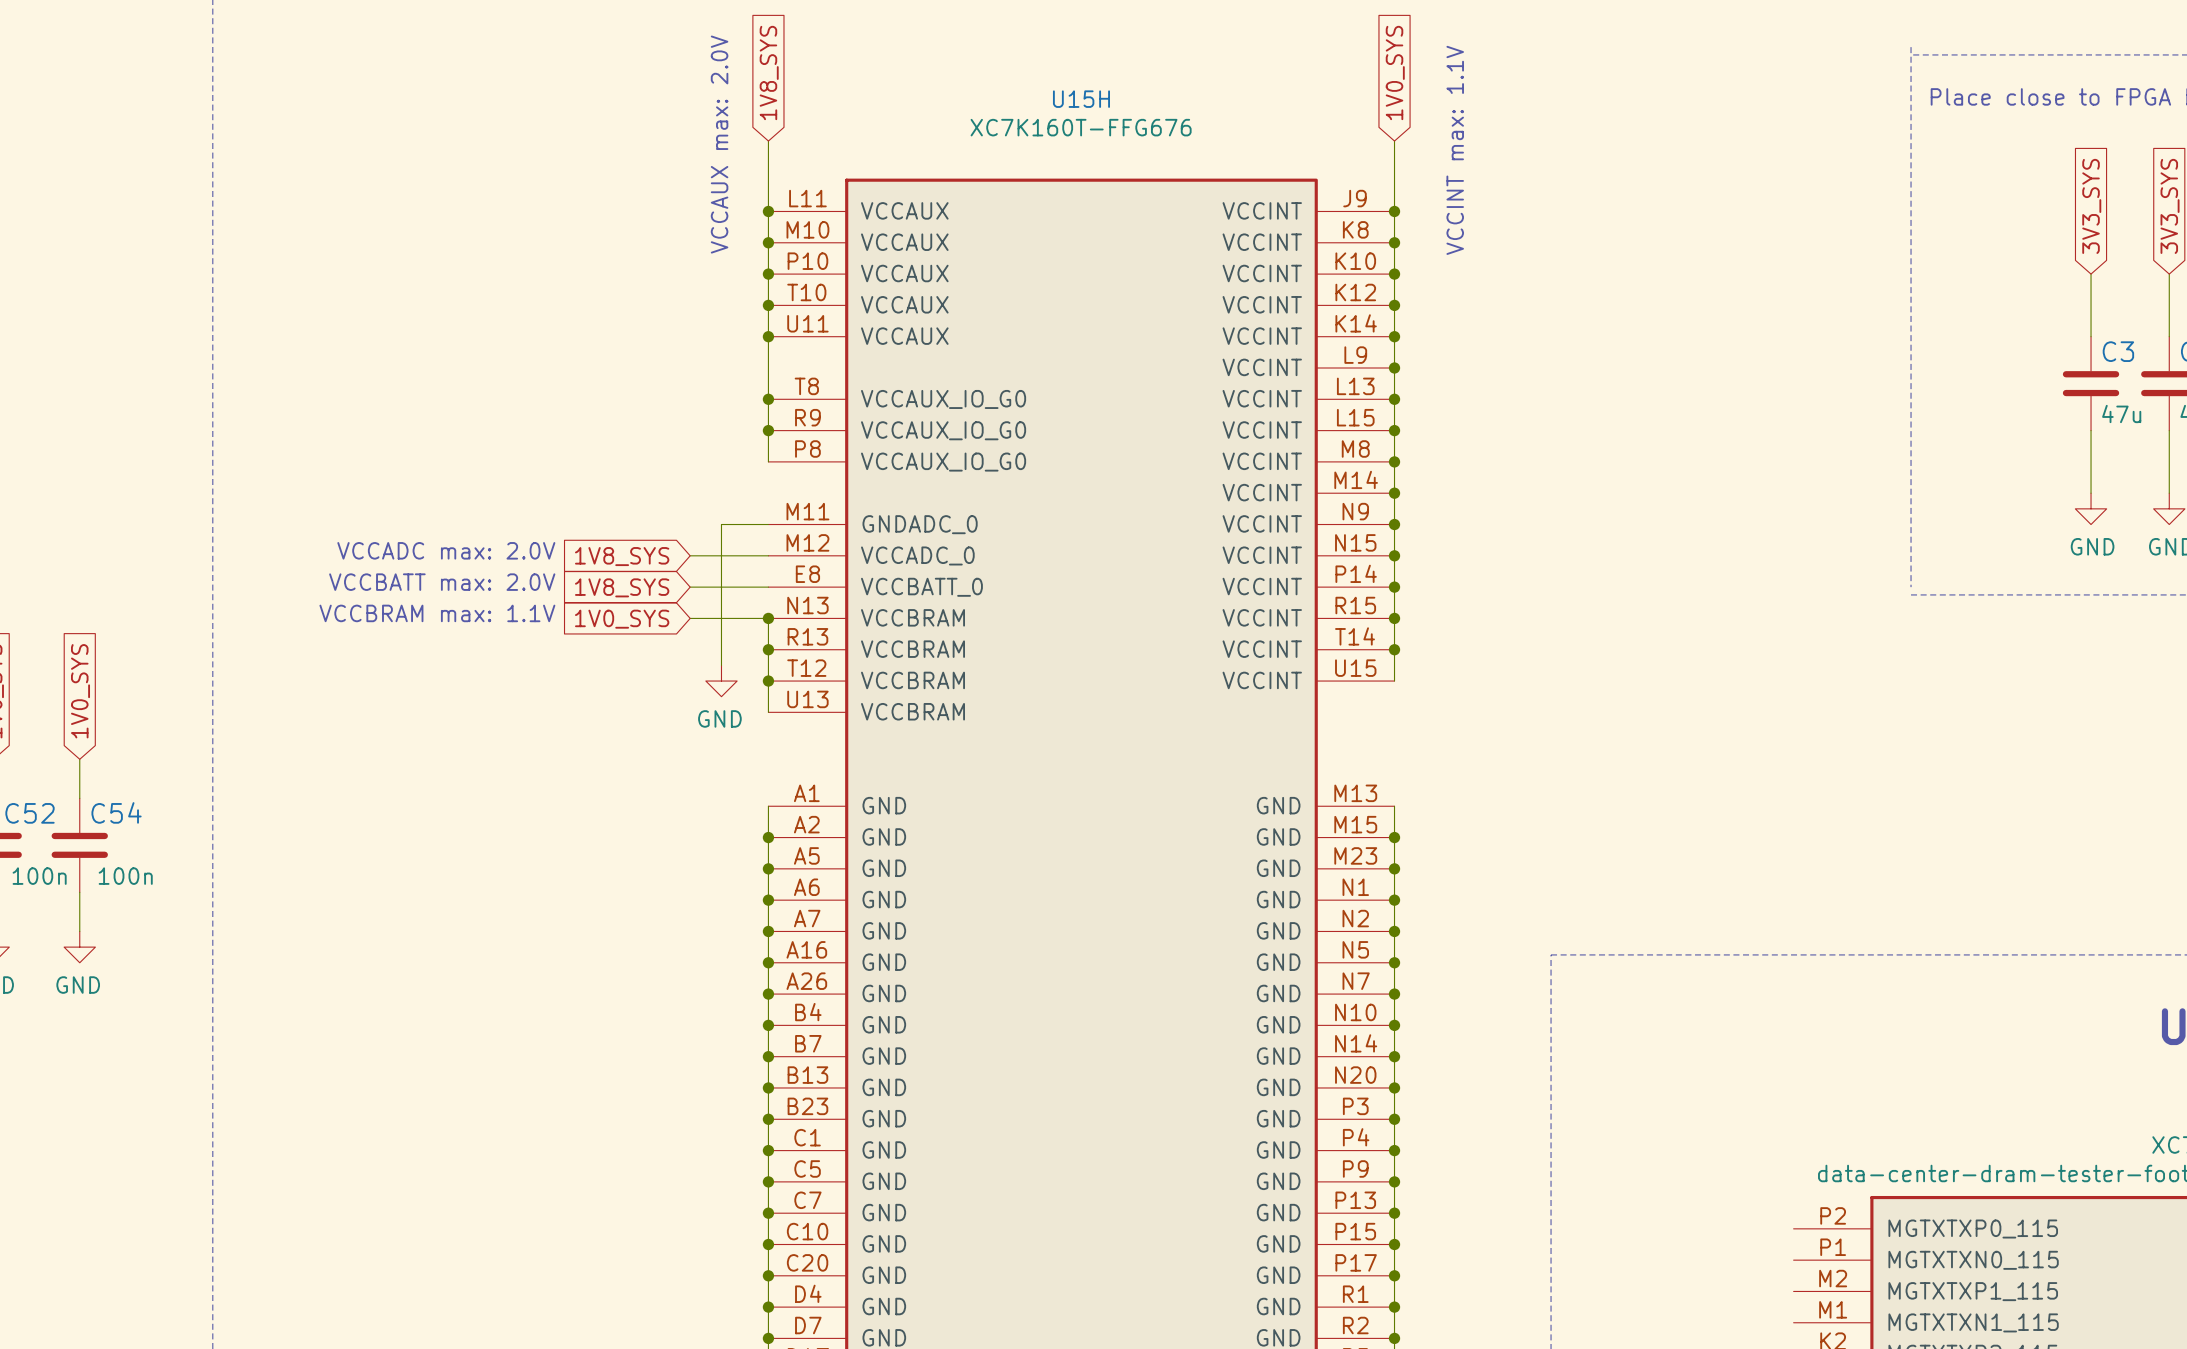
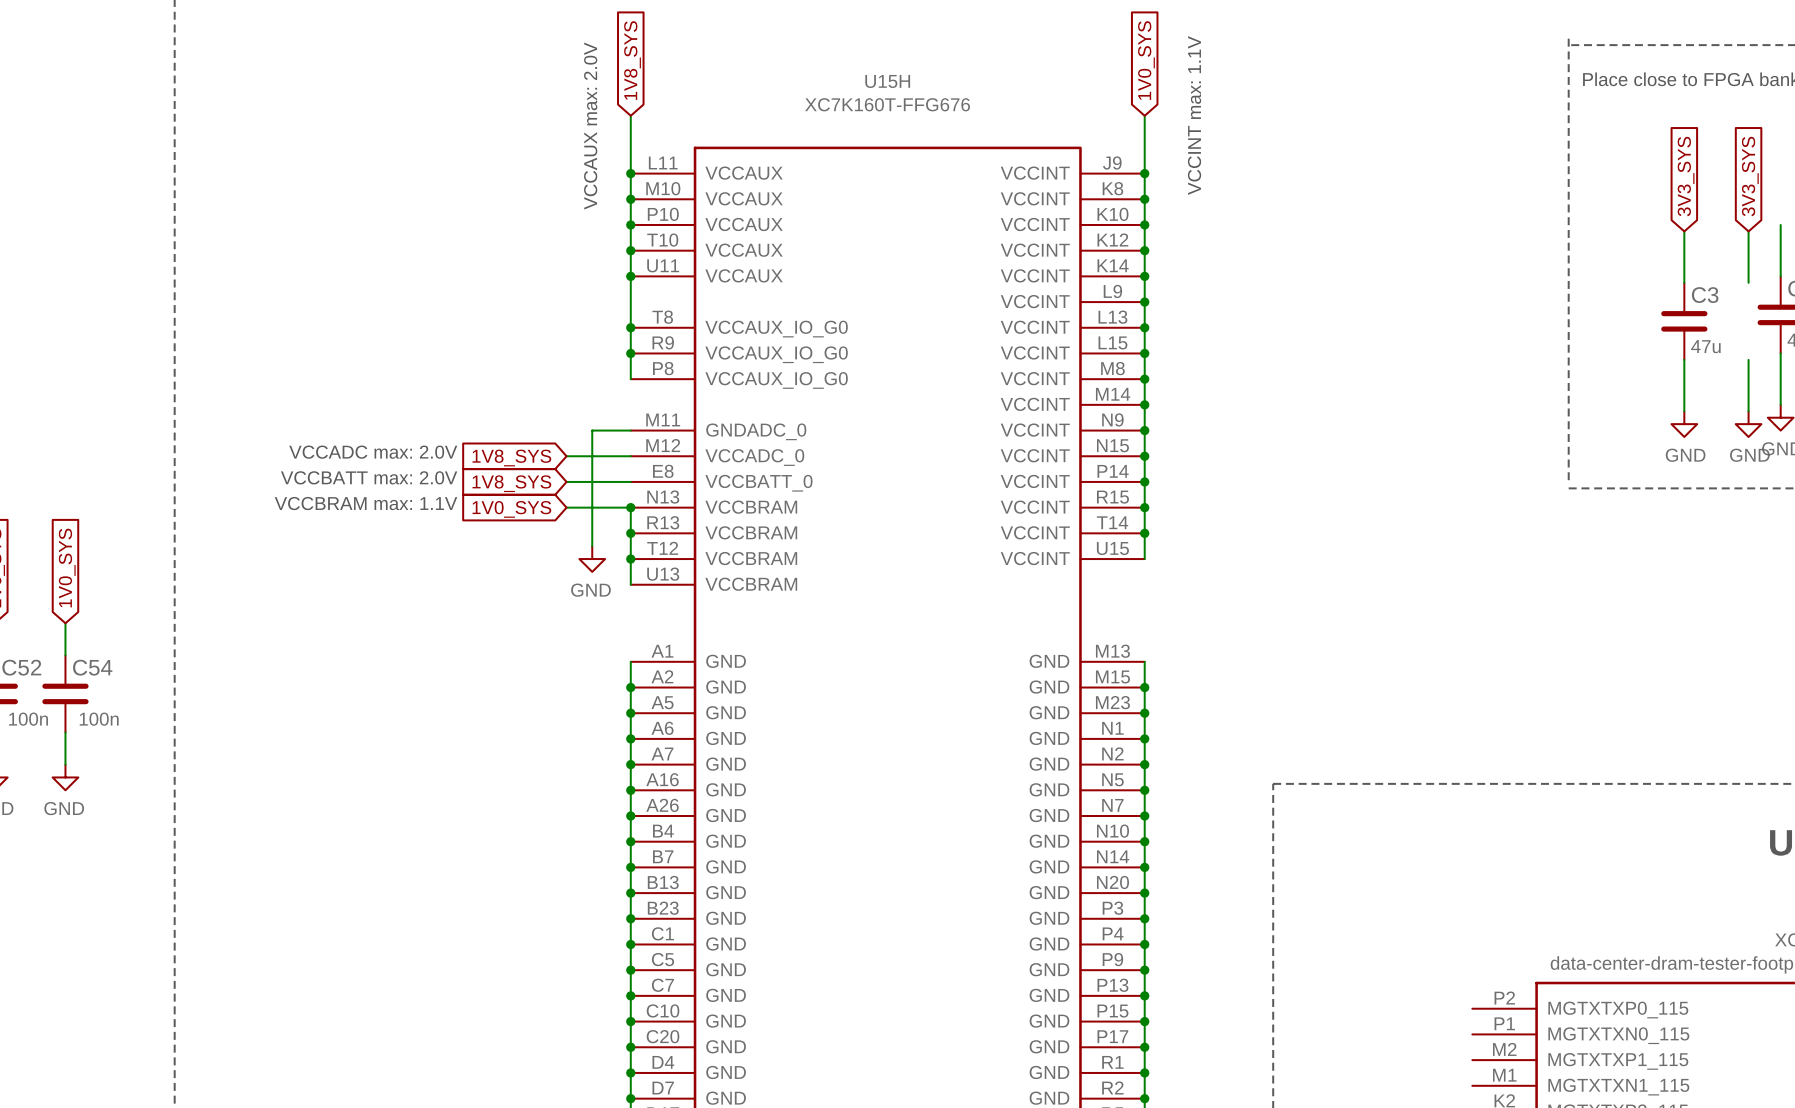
global label: 3V3_SYS (2091, 206) -> none
global label: 3V3_SYS (2170, 206) -> none
global label: none -> 3V3_SYS (1686, 176)
global label: none -> 3V3_SYS (1750, 176)
wire: (2091, 274) (2091, 336) -> (1748, 231) (1748, 282)
wire: none -> (1684, 231) (1684, 282)
C3 position: (2091, 383) -> (1684, 321)
wire: (2091, 430) (2091, 493) -> (1748, 359) (1748, 411)
wire: none -> (1684, 359) (1684, 411)
power symbol: GND (2091, 508) -> none
power symbol: none -> GND (1684, 424)
power symbol: none -> GND (1748, 424)

